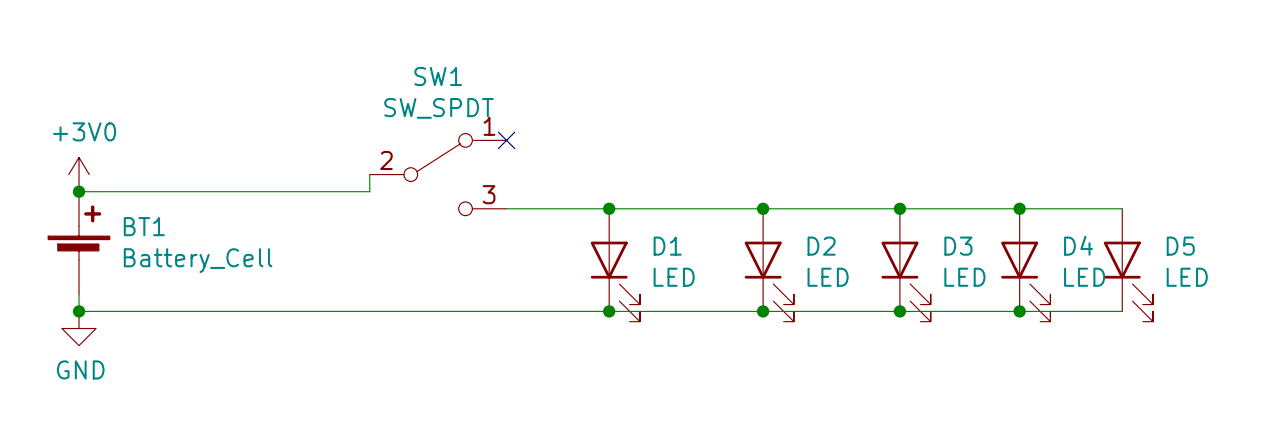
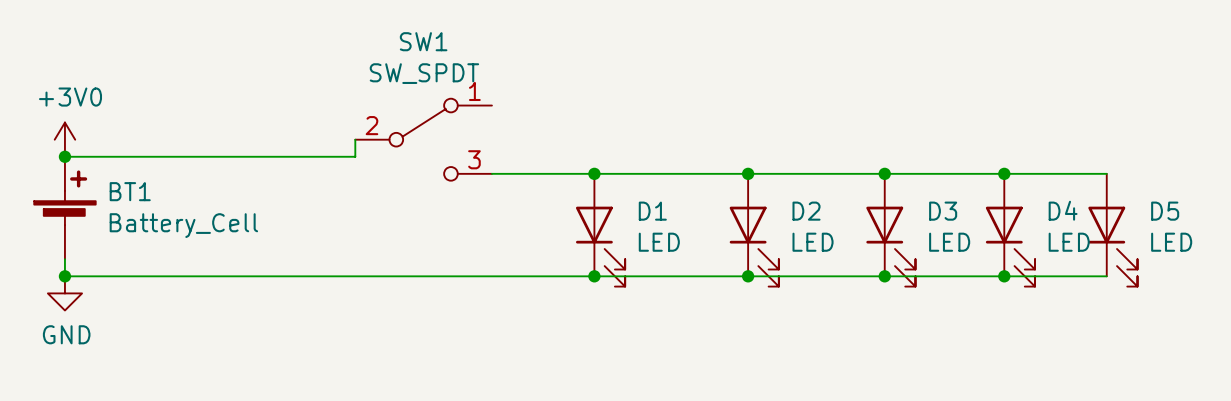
no-connect mark: (506, 140) -> none

